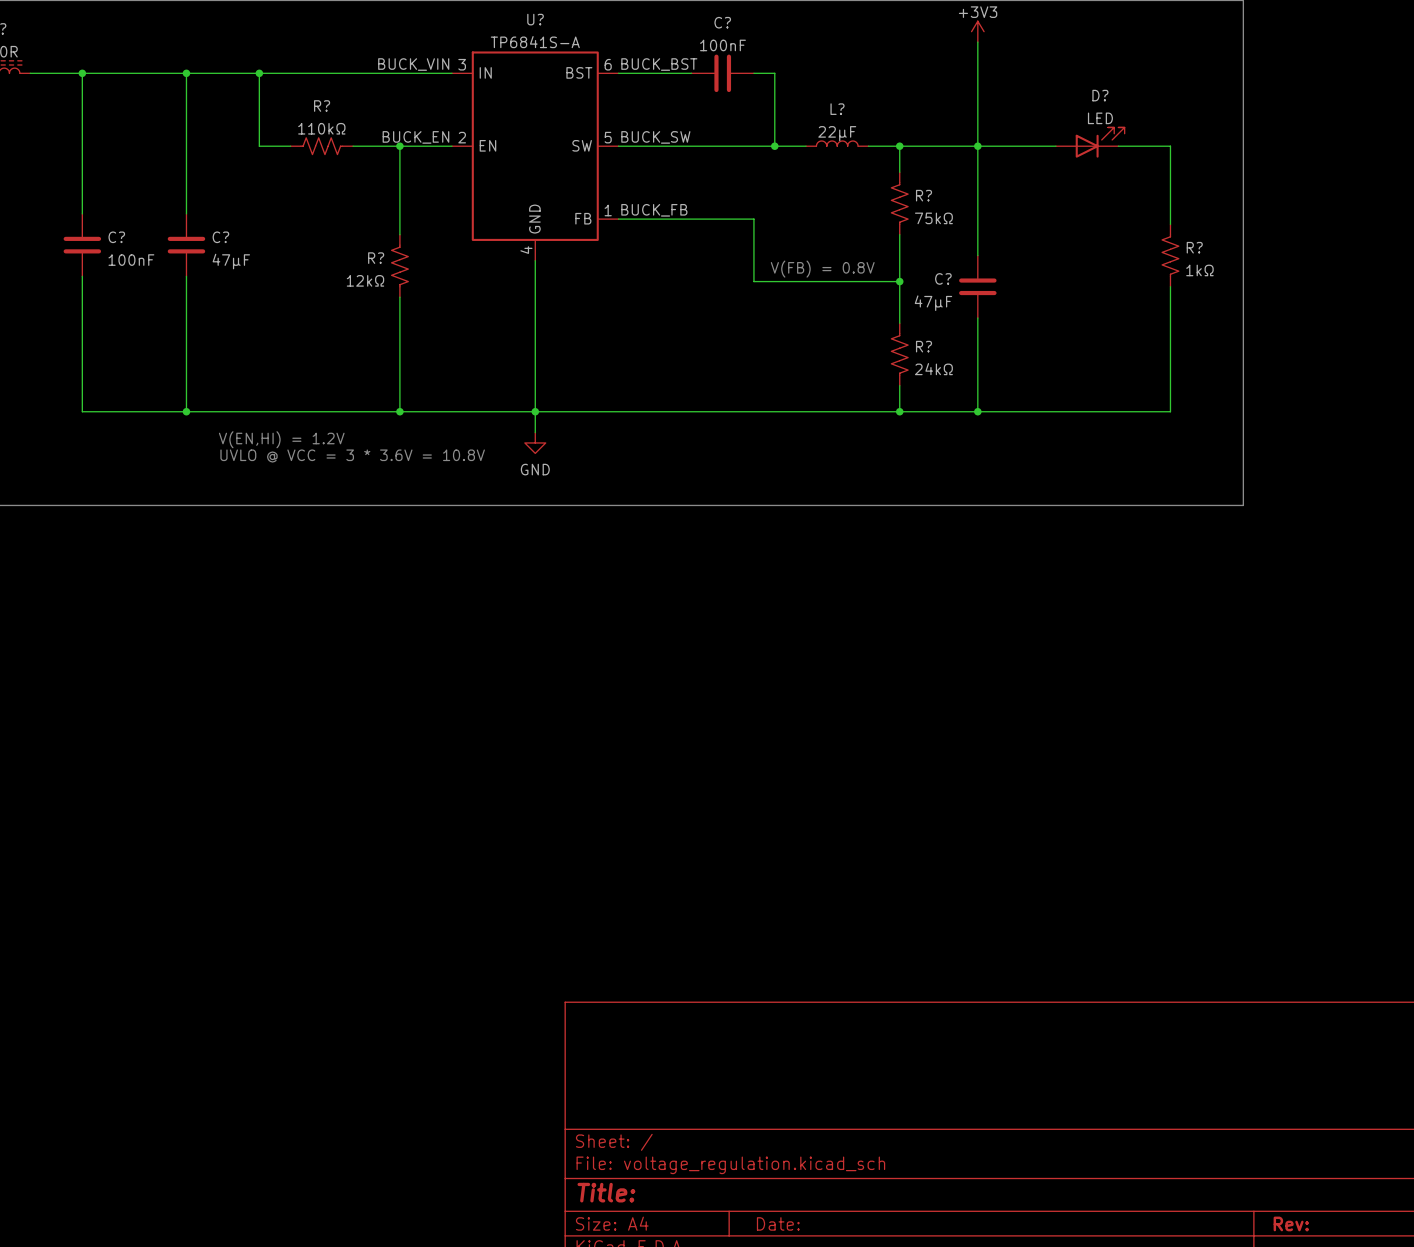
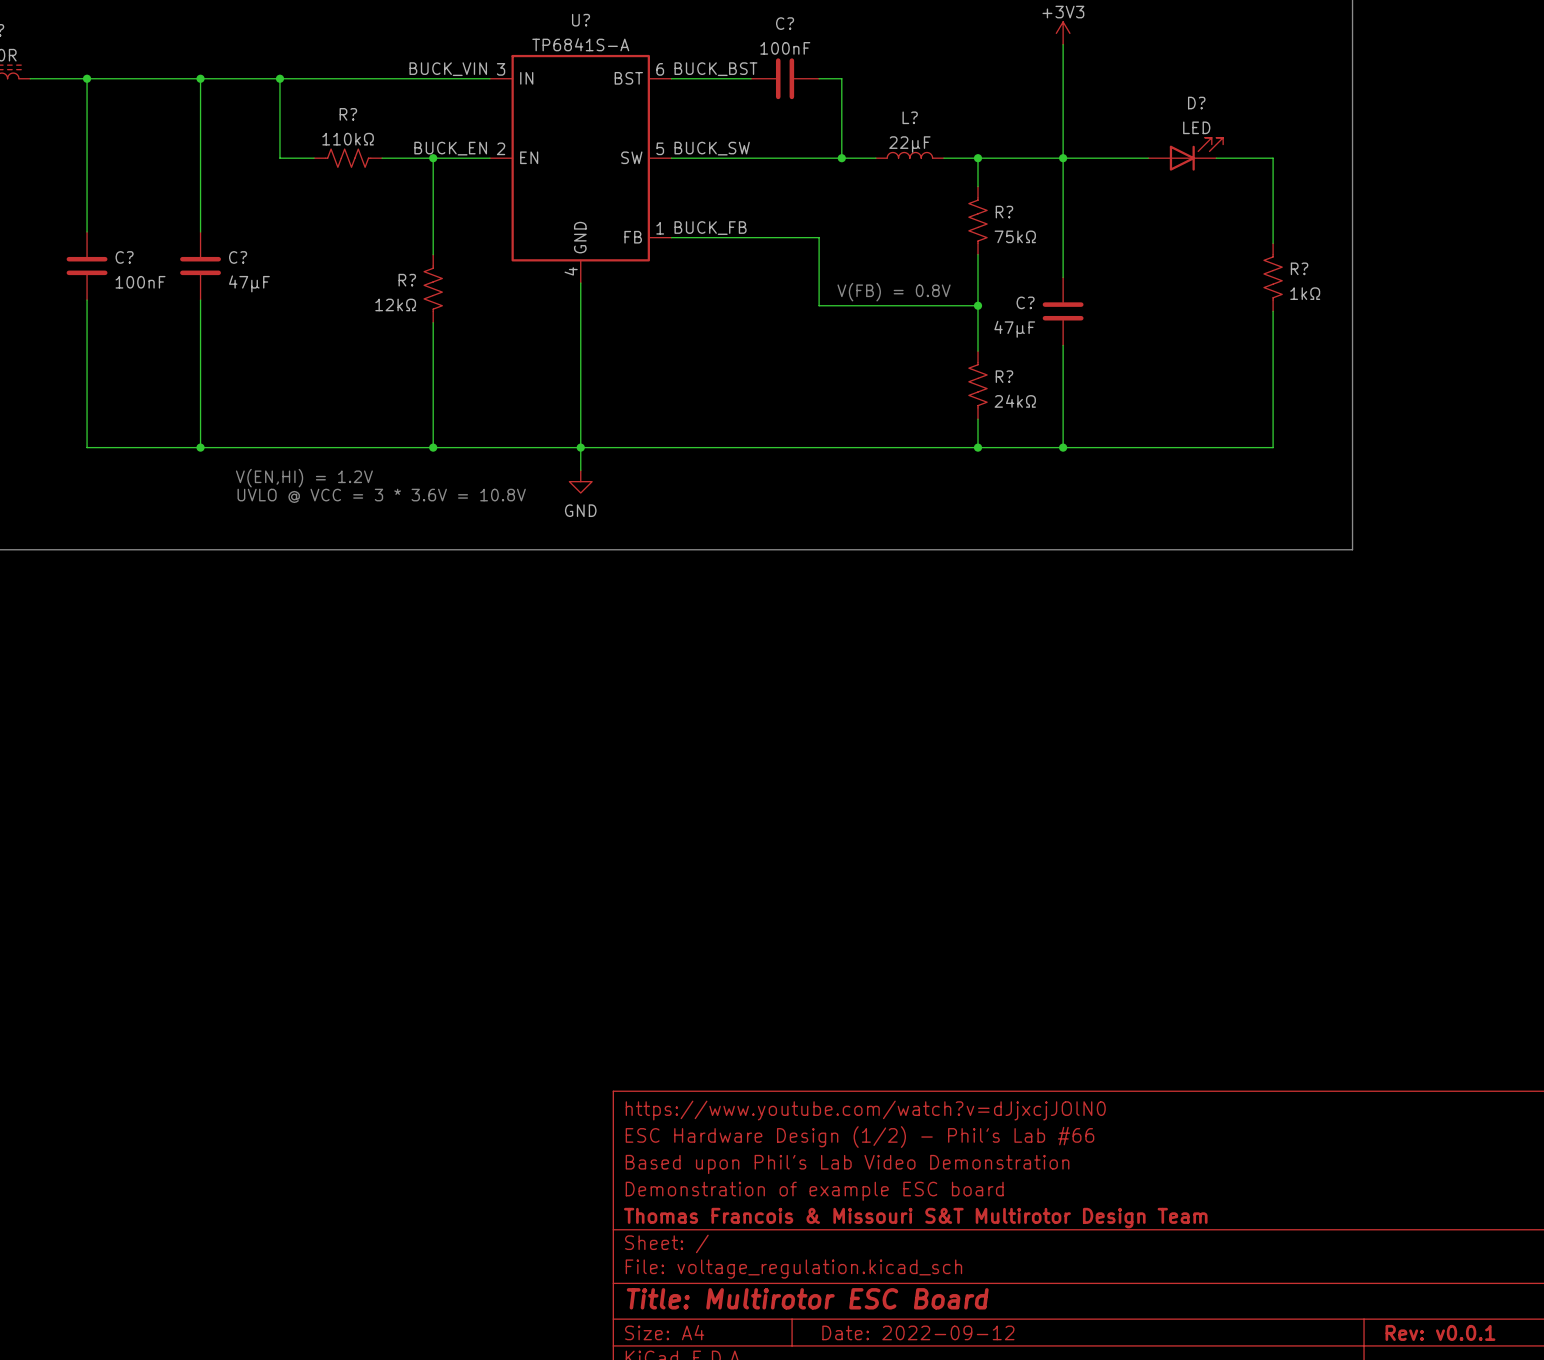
title block: none -> https://www.youtube.com/watch?v=dJjxcjJOlN0 (865, 1110)
title block: none -> ESC Hardware Design (1/2) - Phil's Lab #66 (859, 1137)
title block: none -> Based upon Phil's Lab Video Demonstration (847, 1164)
title block: none -> Demonstration of example ESC board (814, 1191)
title block: none -> Thomas Francois & Missouri S&T Multirotor Design Team (915, 1218)
title block: Title: (606, 1192) -> Title: Multirotor ESC Board (807, 1298)
title block: Date: (778, 1223) -> Date: 2022-09-12 (918, 1332)
title block: Rev: (1291, 1223) -> Rev: v0.0.1 (1440, 1332)

